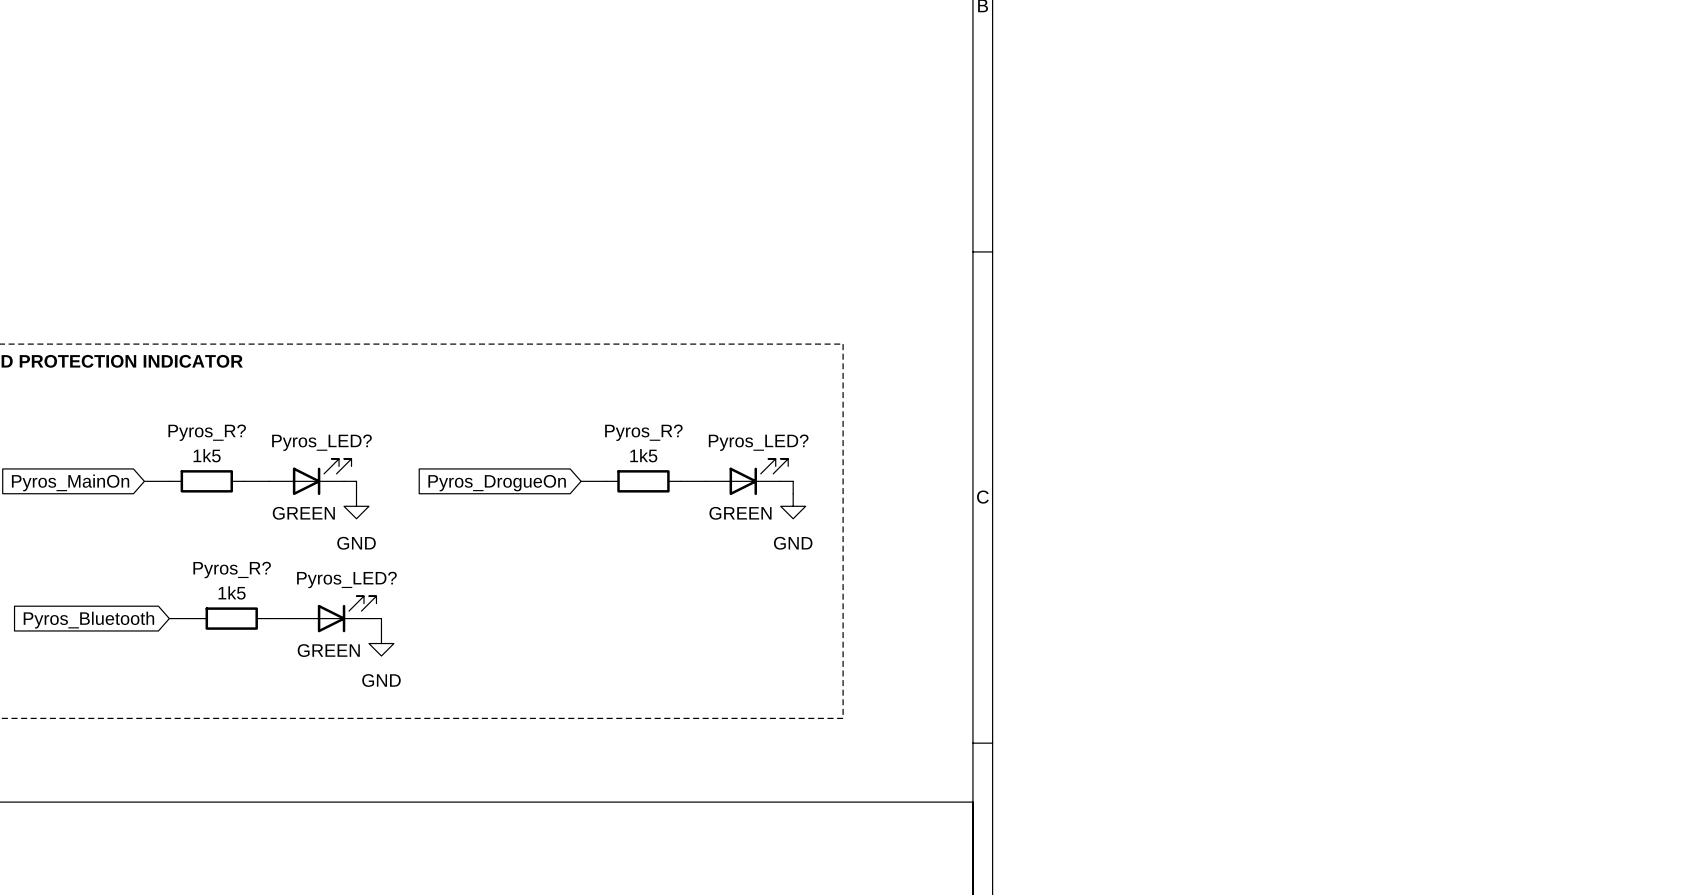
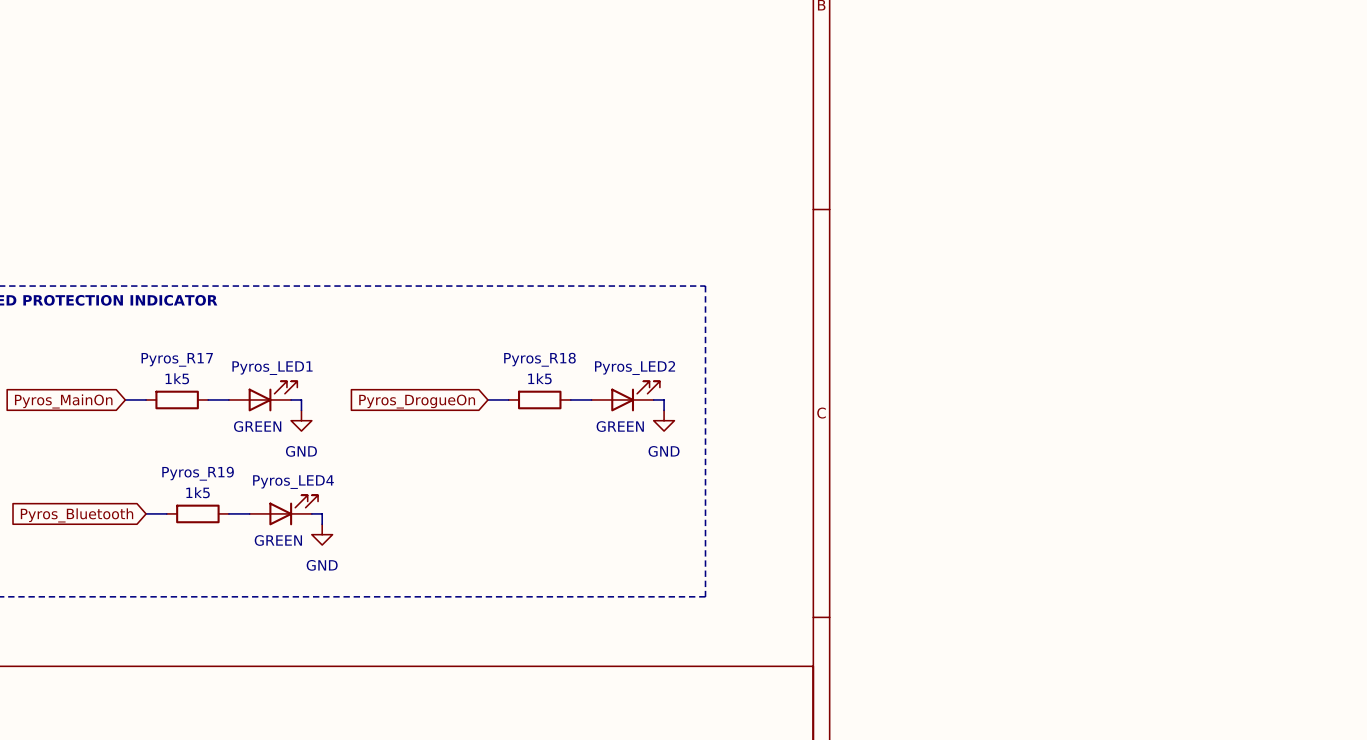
Pyros_R? name: Pyros_R? (207, 432) -> Pyros_R17 (177, 359)
Pyros_R? name: Pyros_R? (643, 432) -> Pyros_R18 (539, 359)
Pyros_LED? name: Pyros_LED? (321, 442) -> Pyros_LED1 (272, 368)
Pyros_LED? name: Pyros_LED? (758, 442) -> Pyros_LED2 (635, 368)
Pyros_R? name: Pyros_R? (232, 570) -> Pyros_R19 (198, 473)
Pyros_LED? name: Pyros_LED? (346, 579) -> Pyros_LED4 (293, 482)

